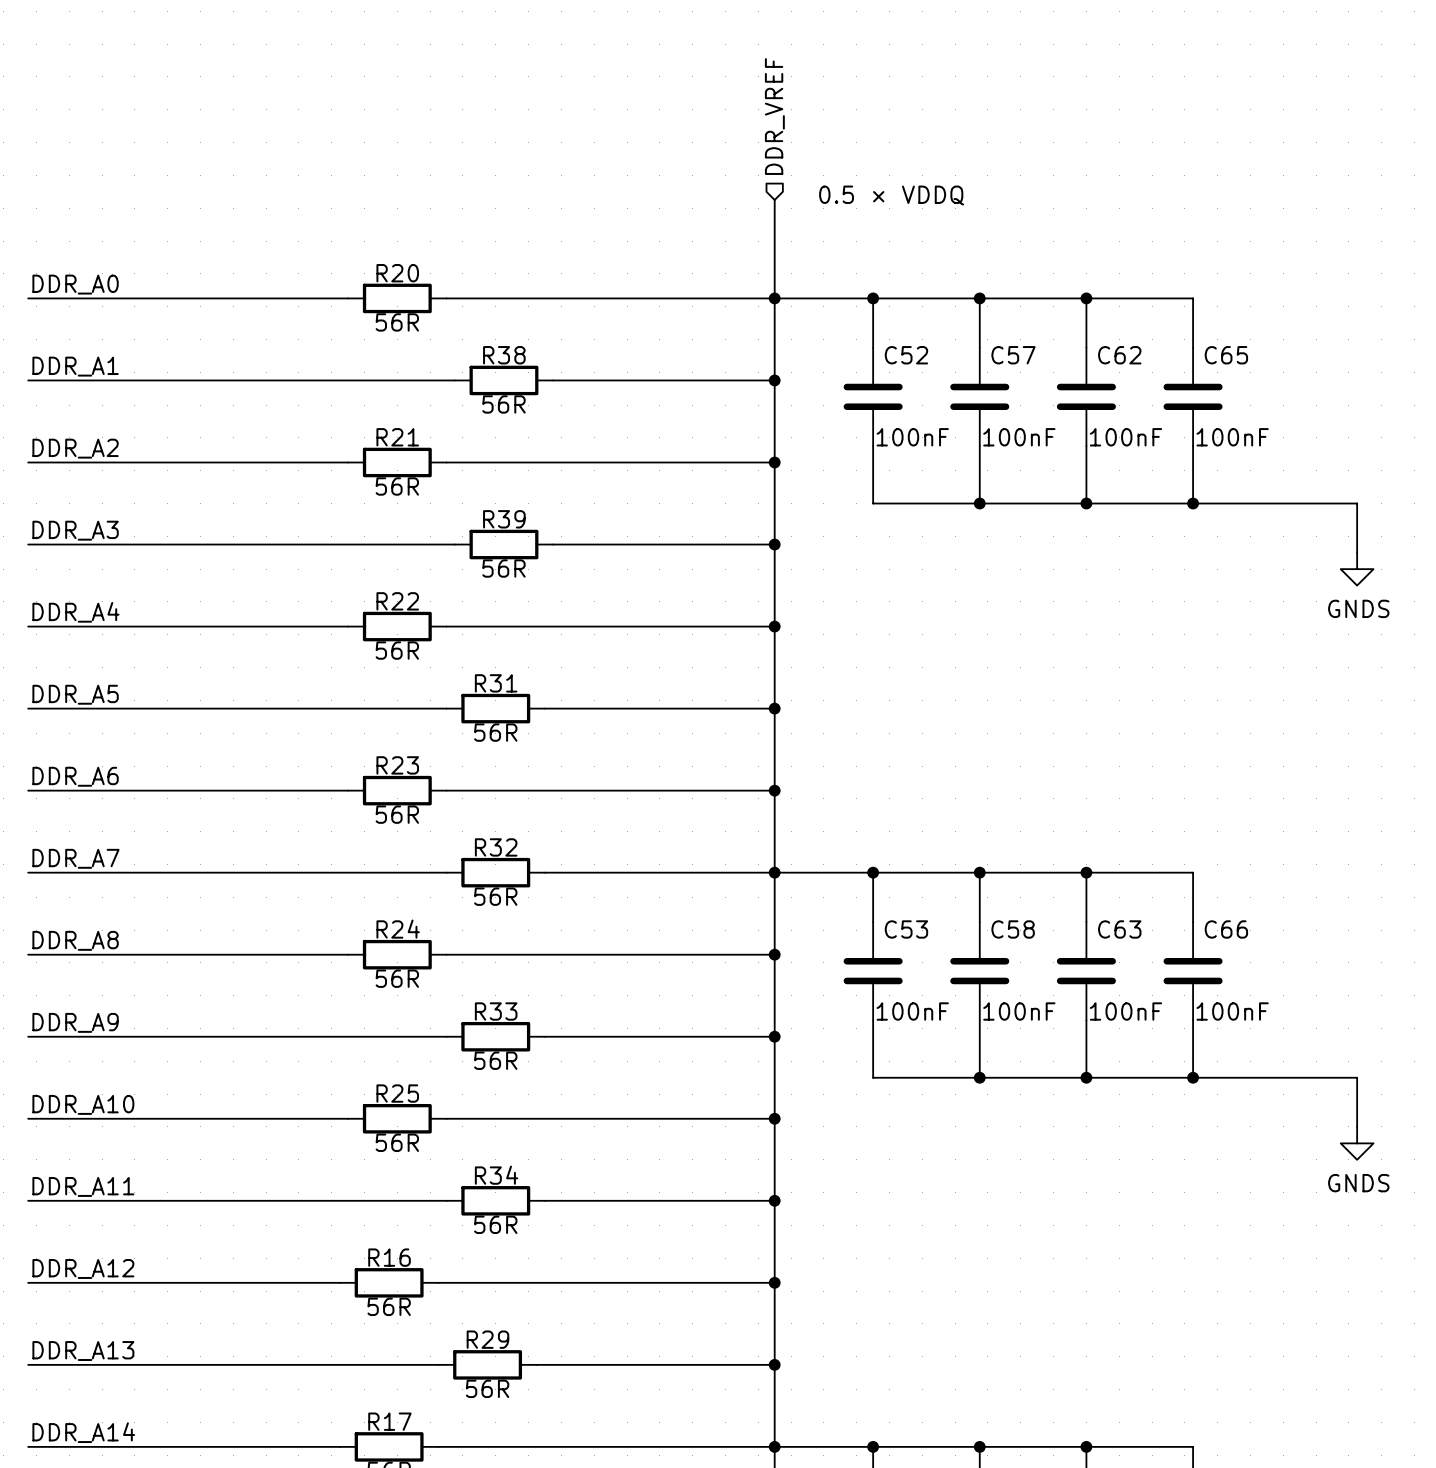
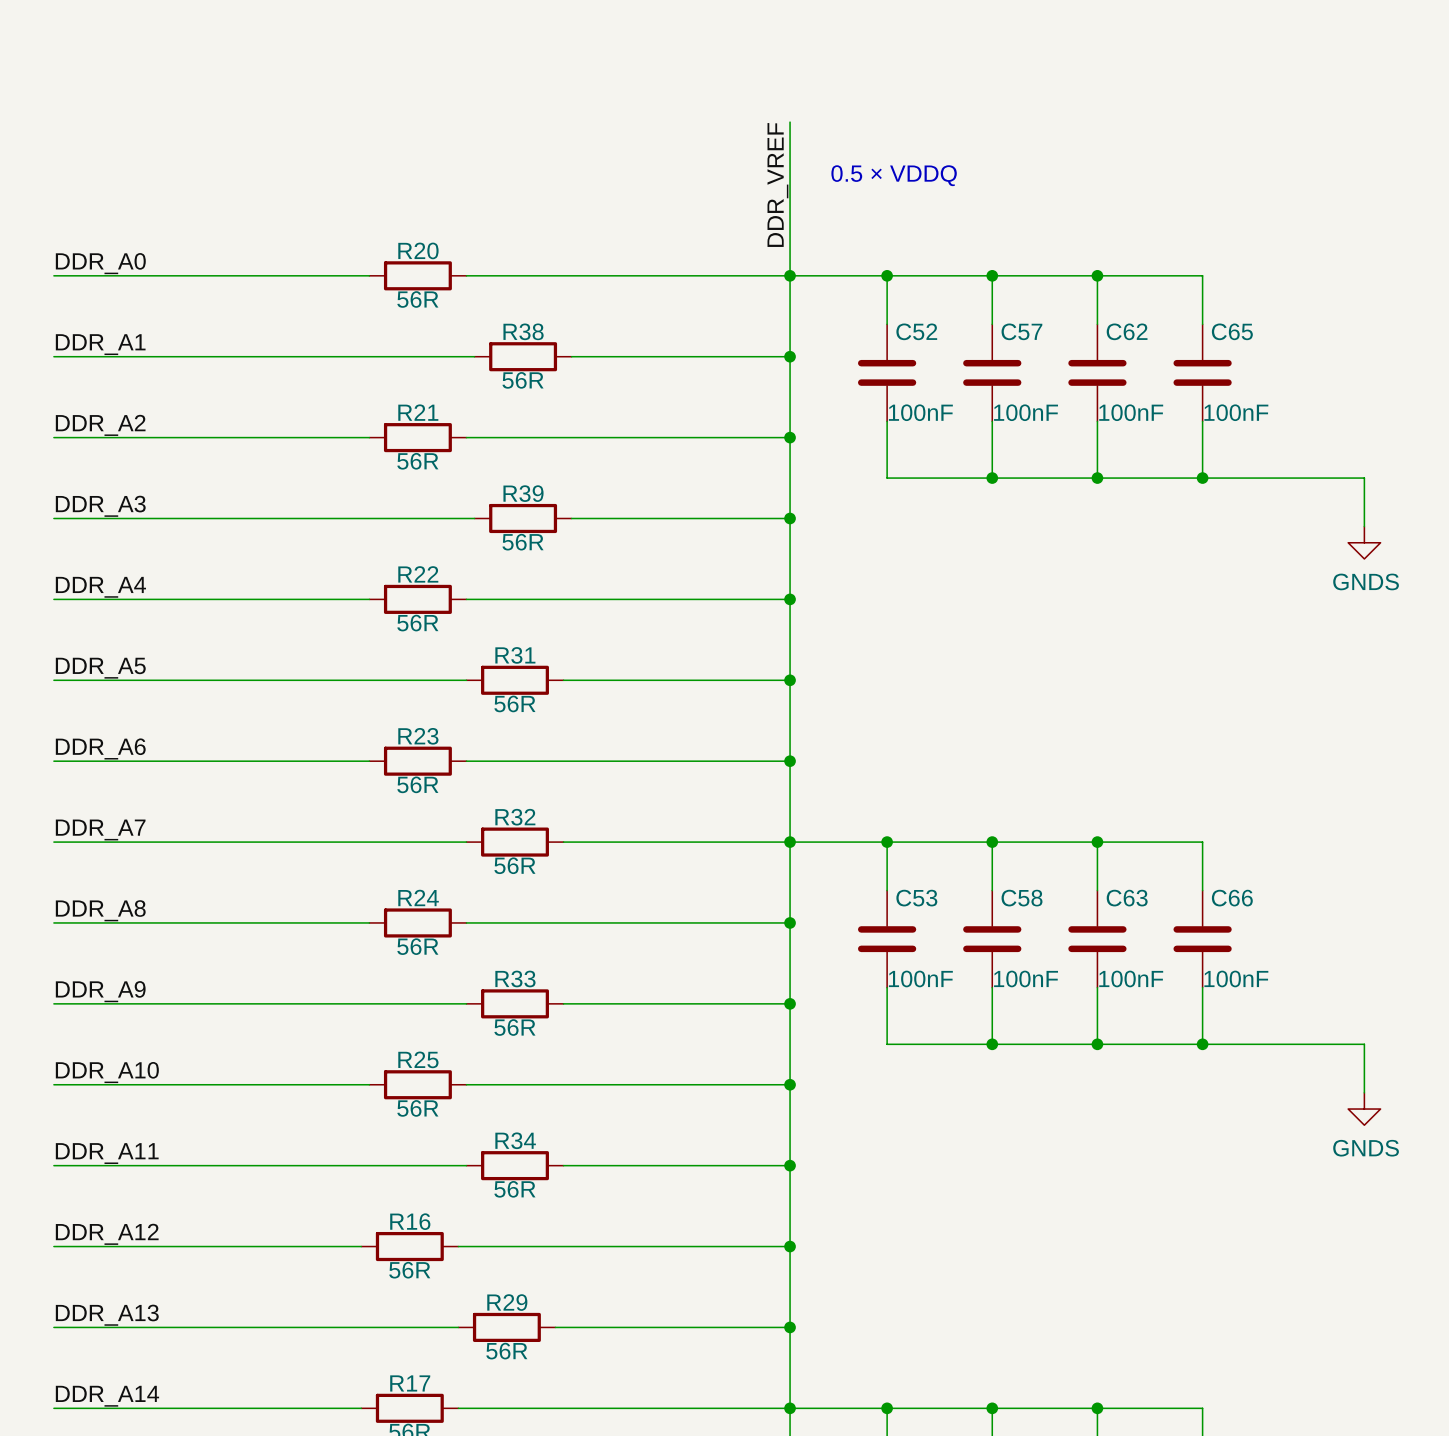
hierarchical label: DDR_VREF (774, 116) -> none
wire: none -> (790, 122) (790, 178)
label: none -> DDR_VREF (777, 185)

